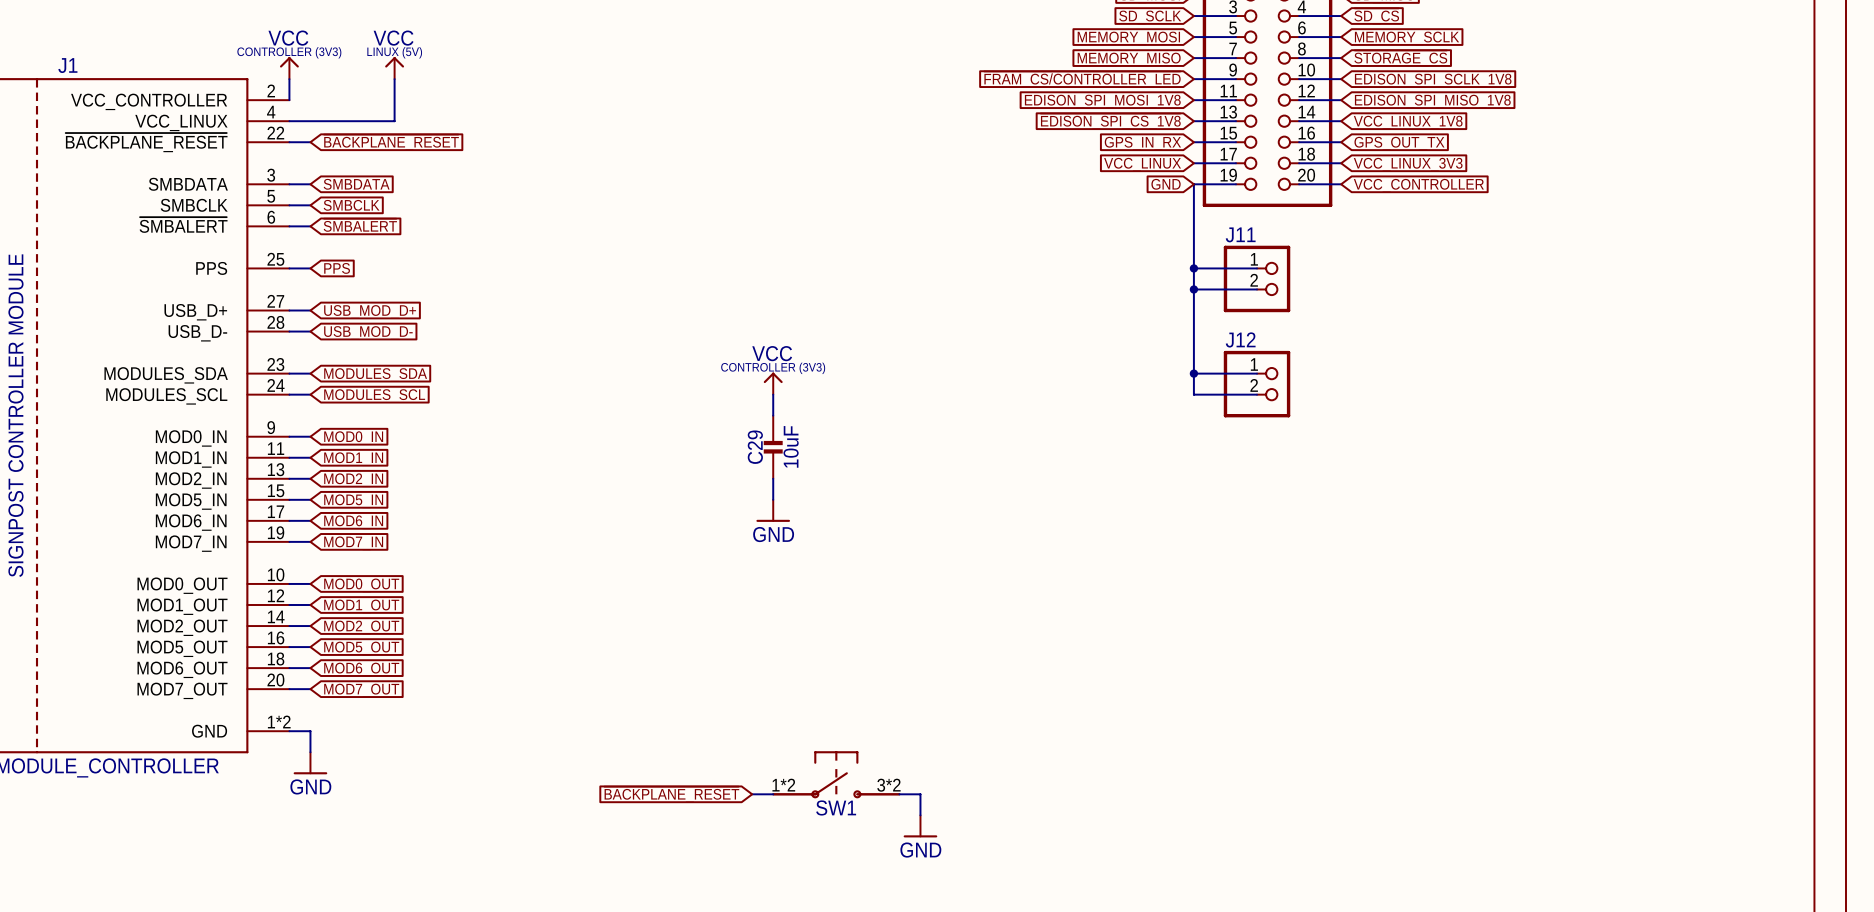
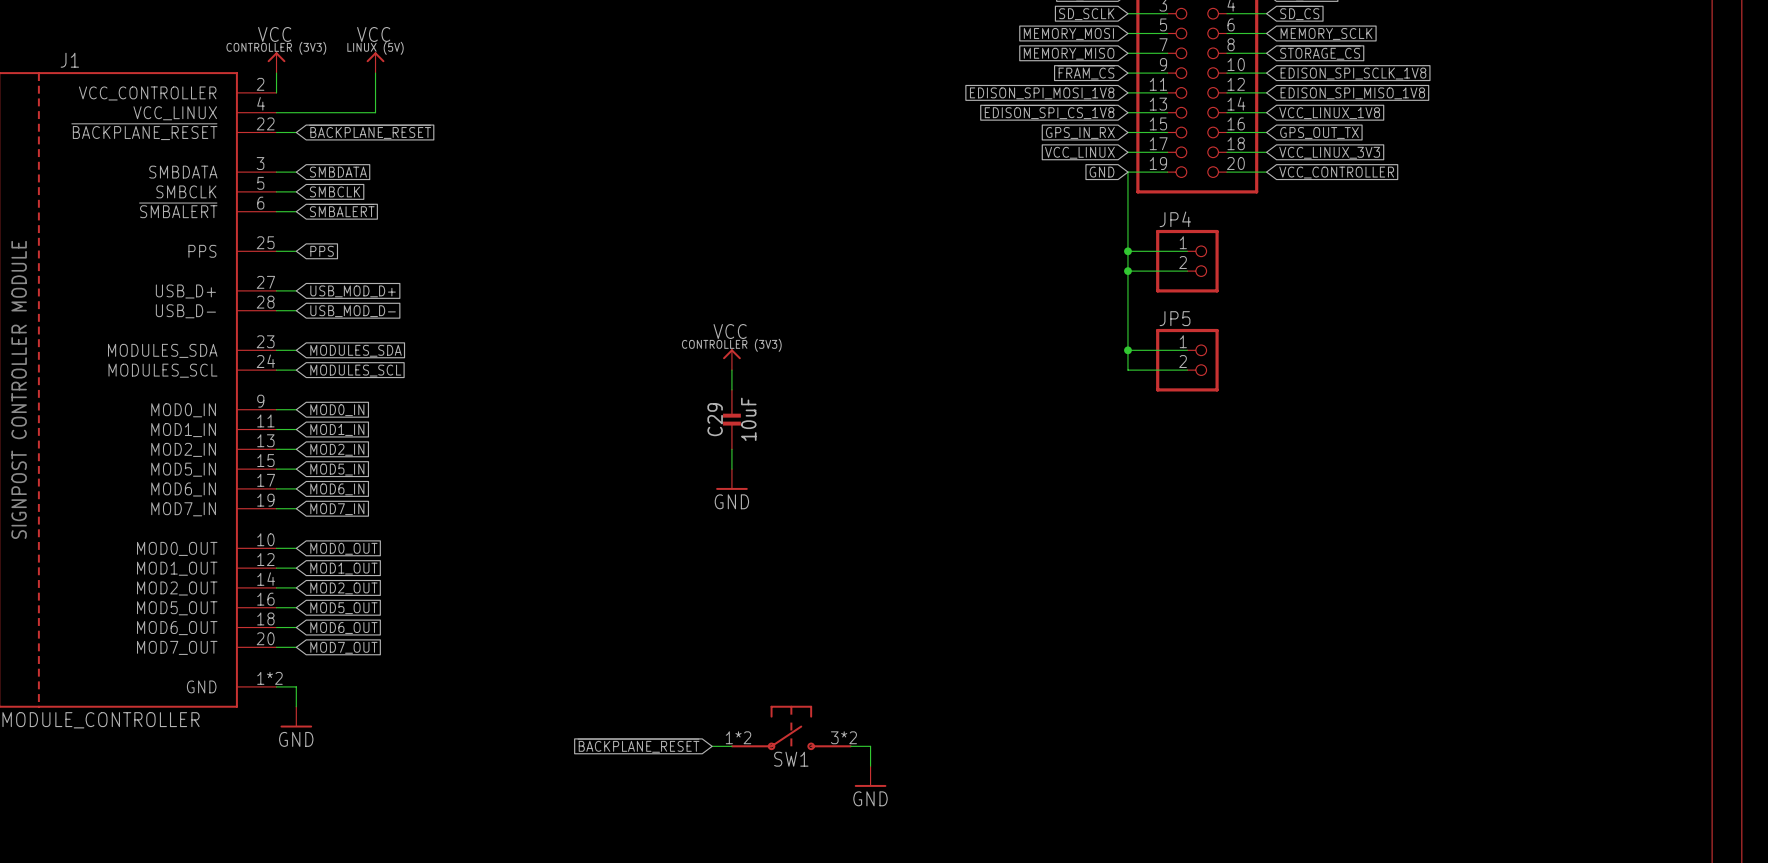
global label: ~{FRAM_CS/CONTROLLER_LED} (1082, 79) -> ~{FRAM_CS} (1086, 72)
J11 name: J11 (1240, 234) -> JP4 (1175, 219)
J12 name: J12 (1240, 339) -> JP5 (1175, 318)

